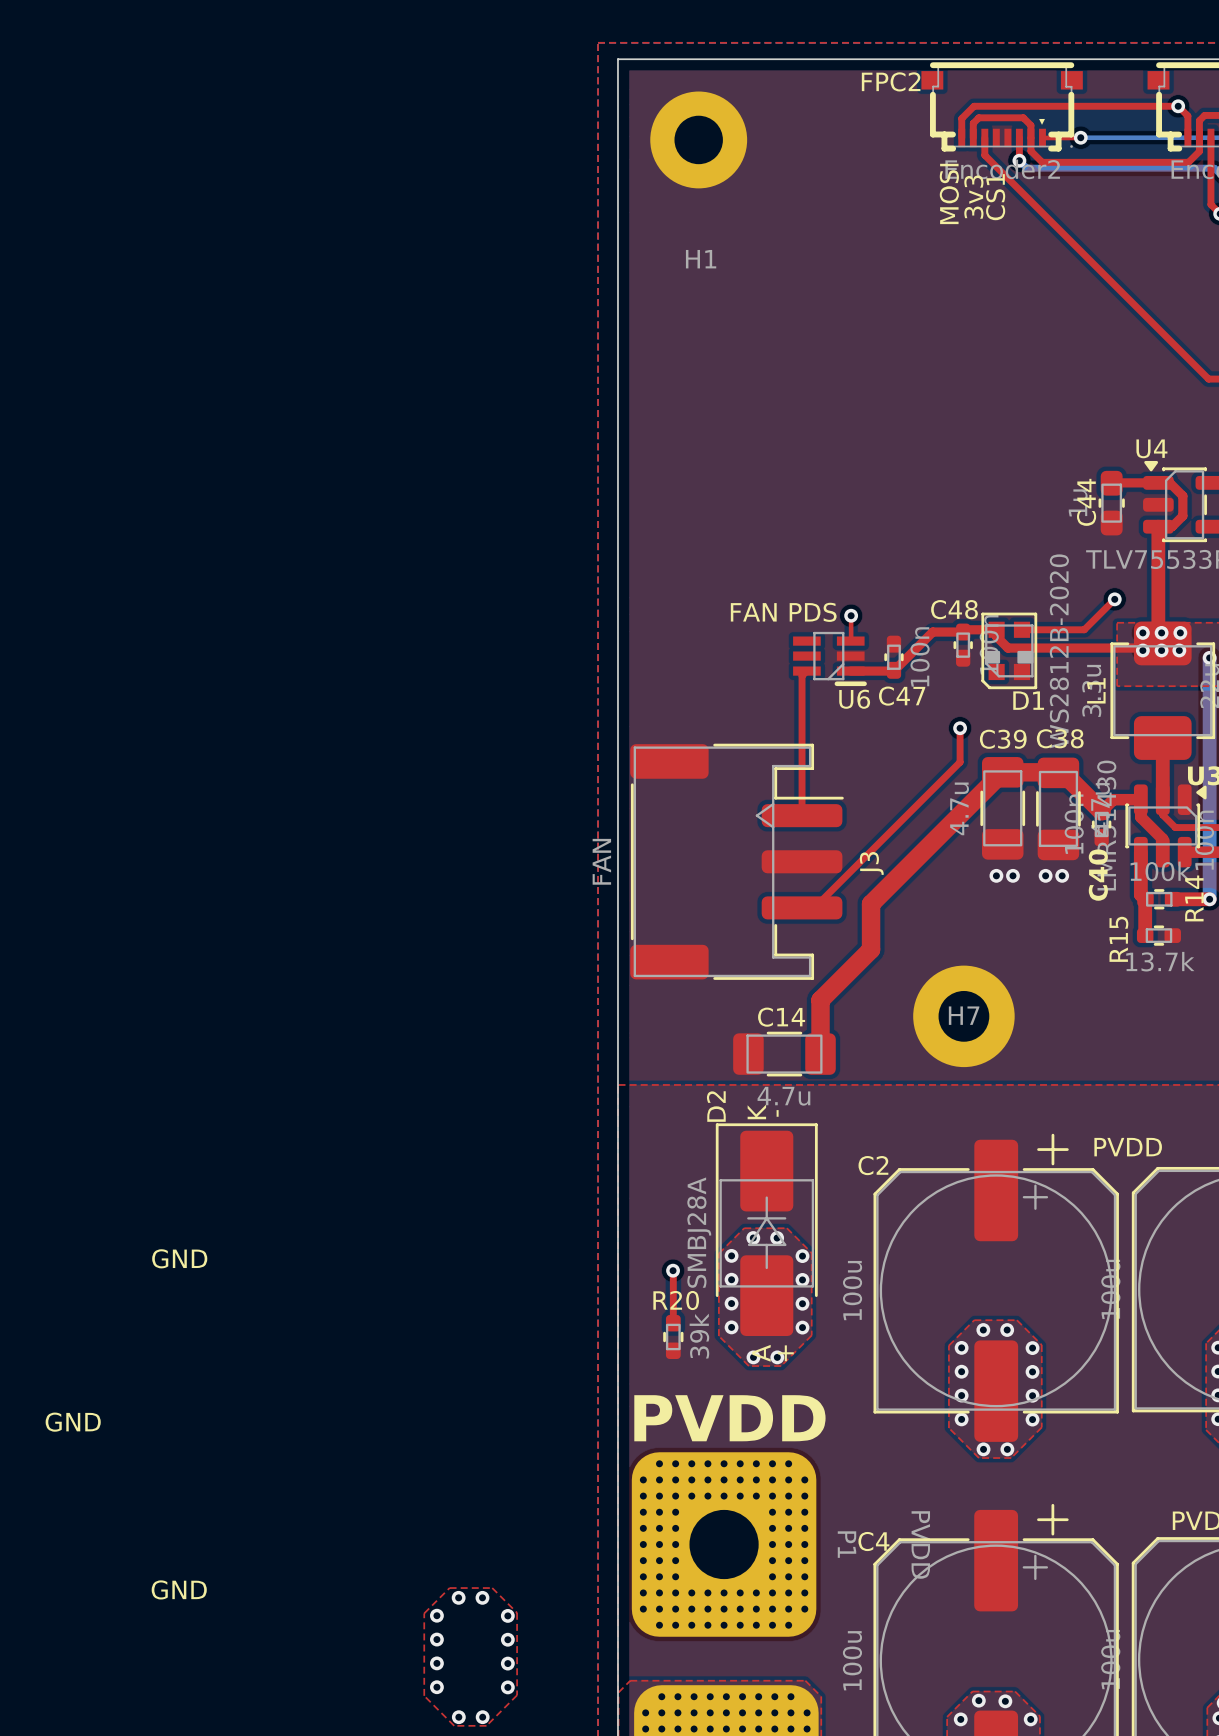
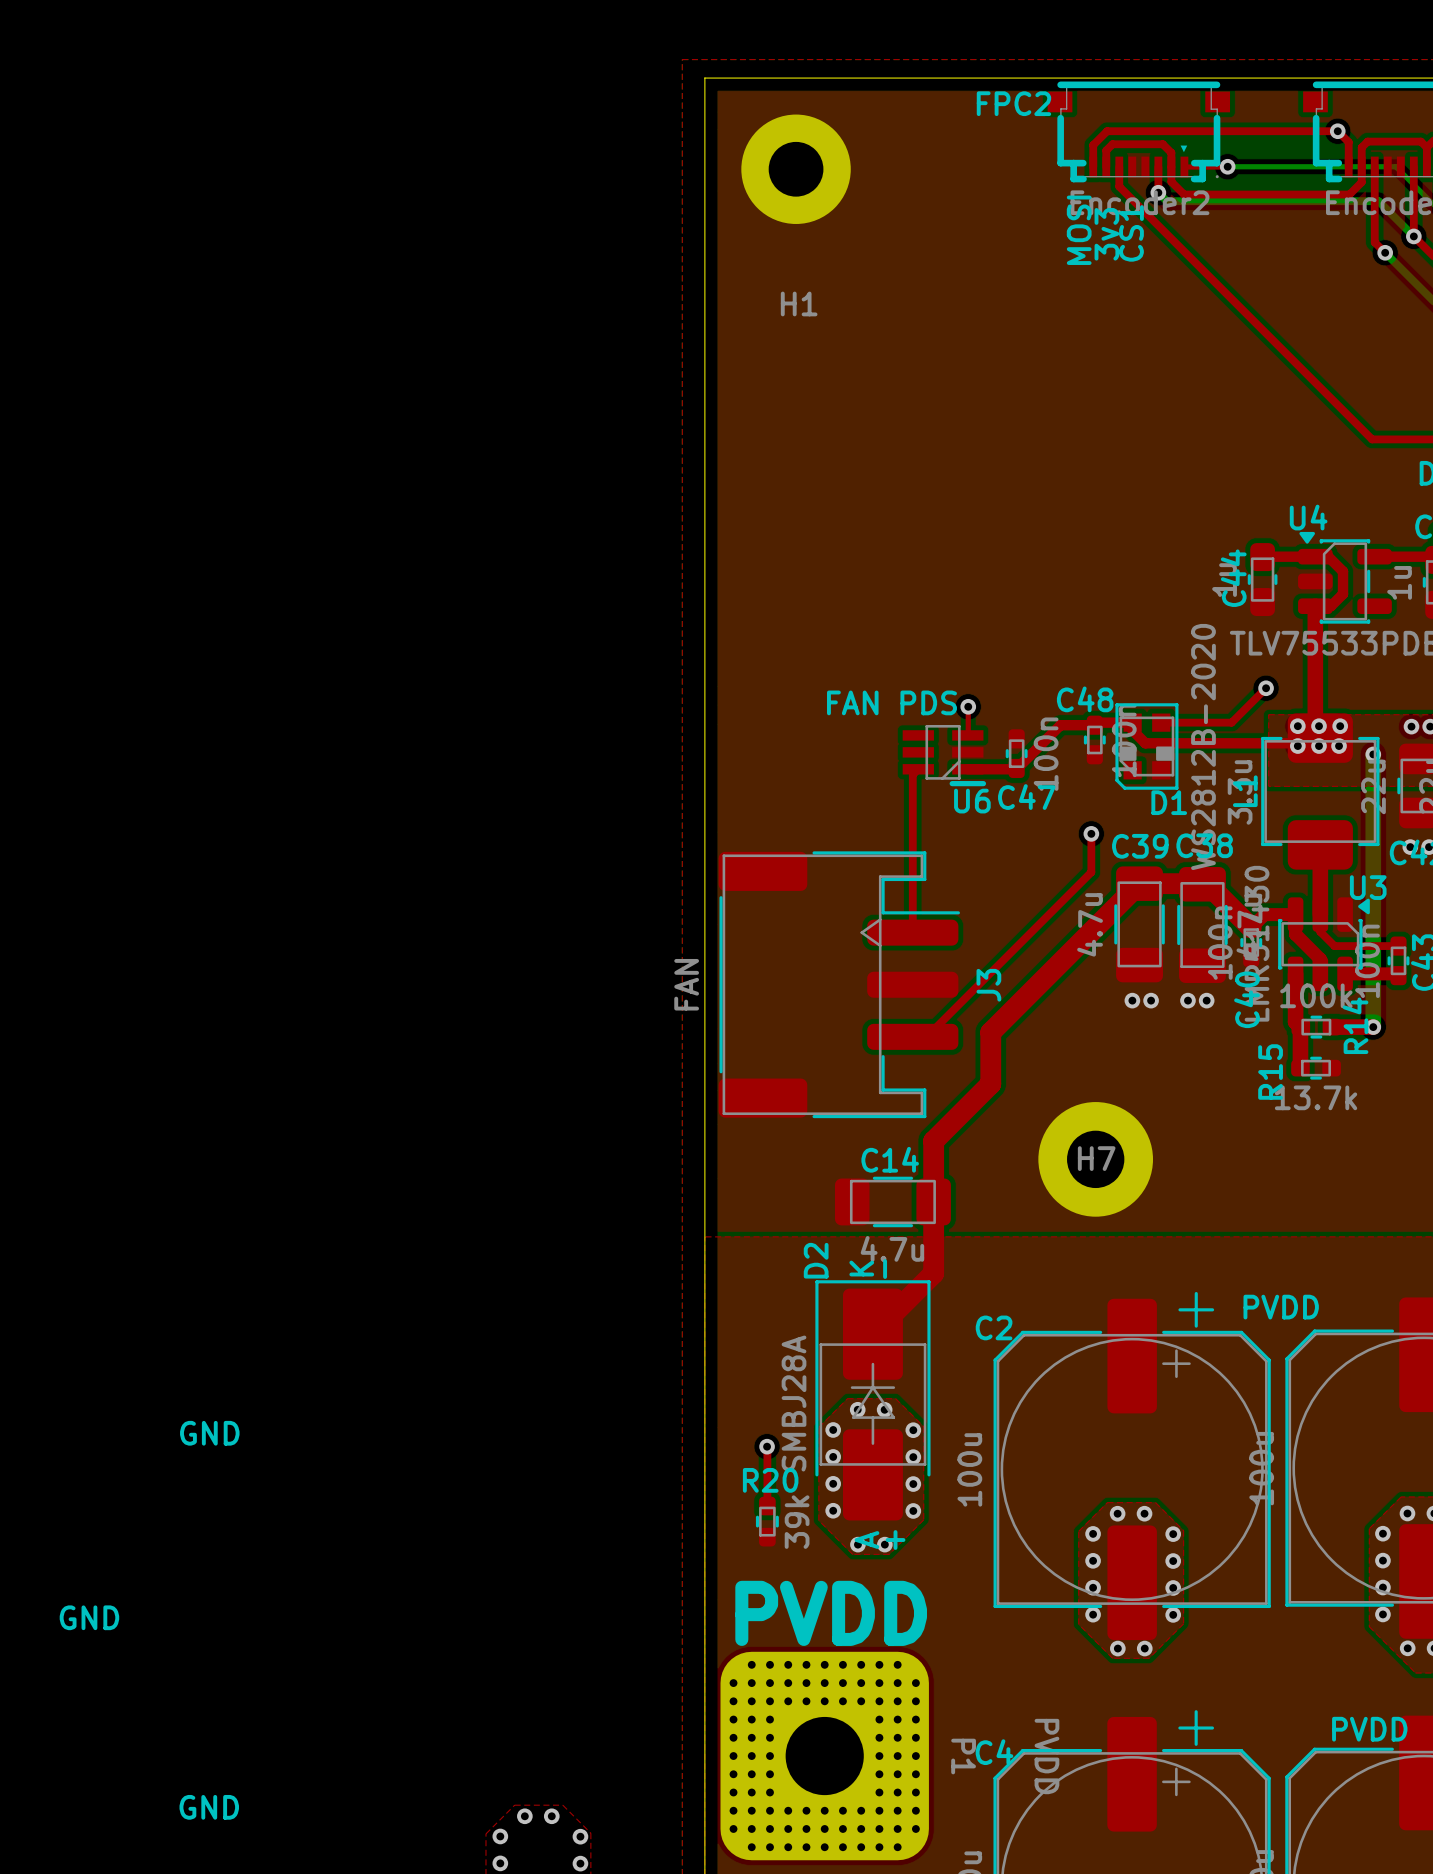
top track: none -> (933, 1201) (933, 1273) (872, 1334)

